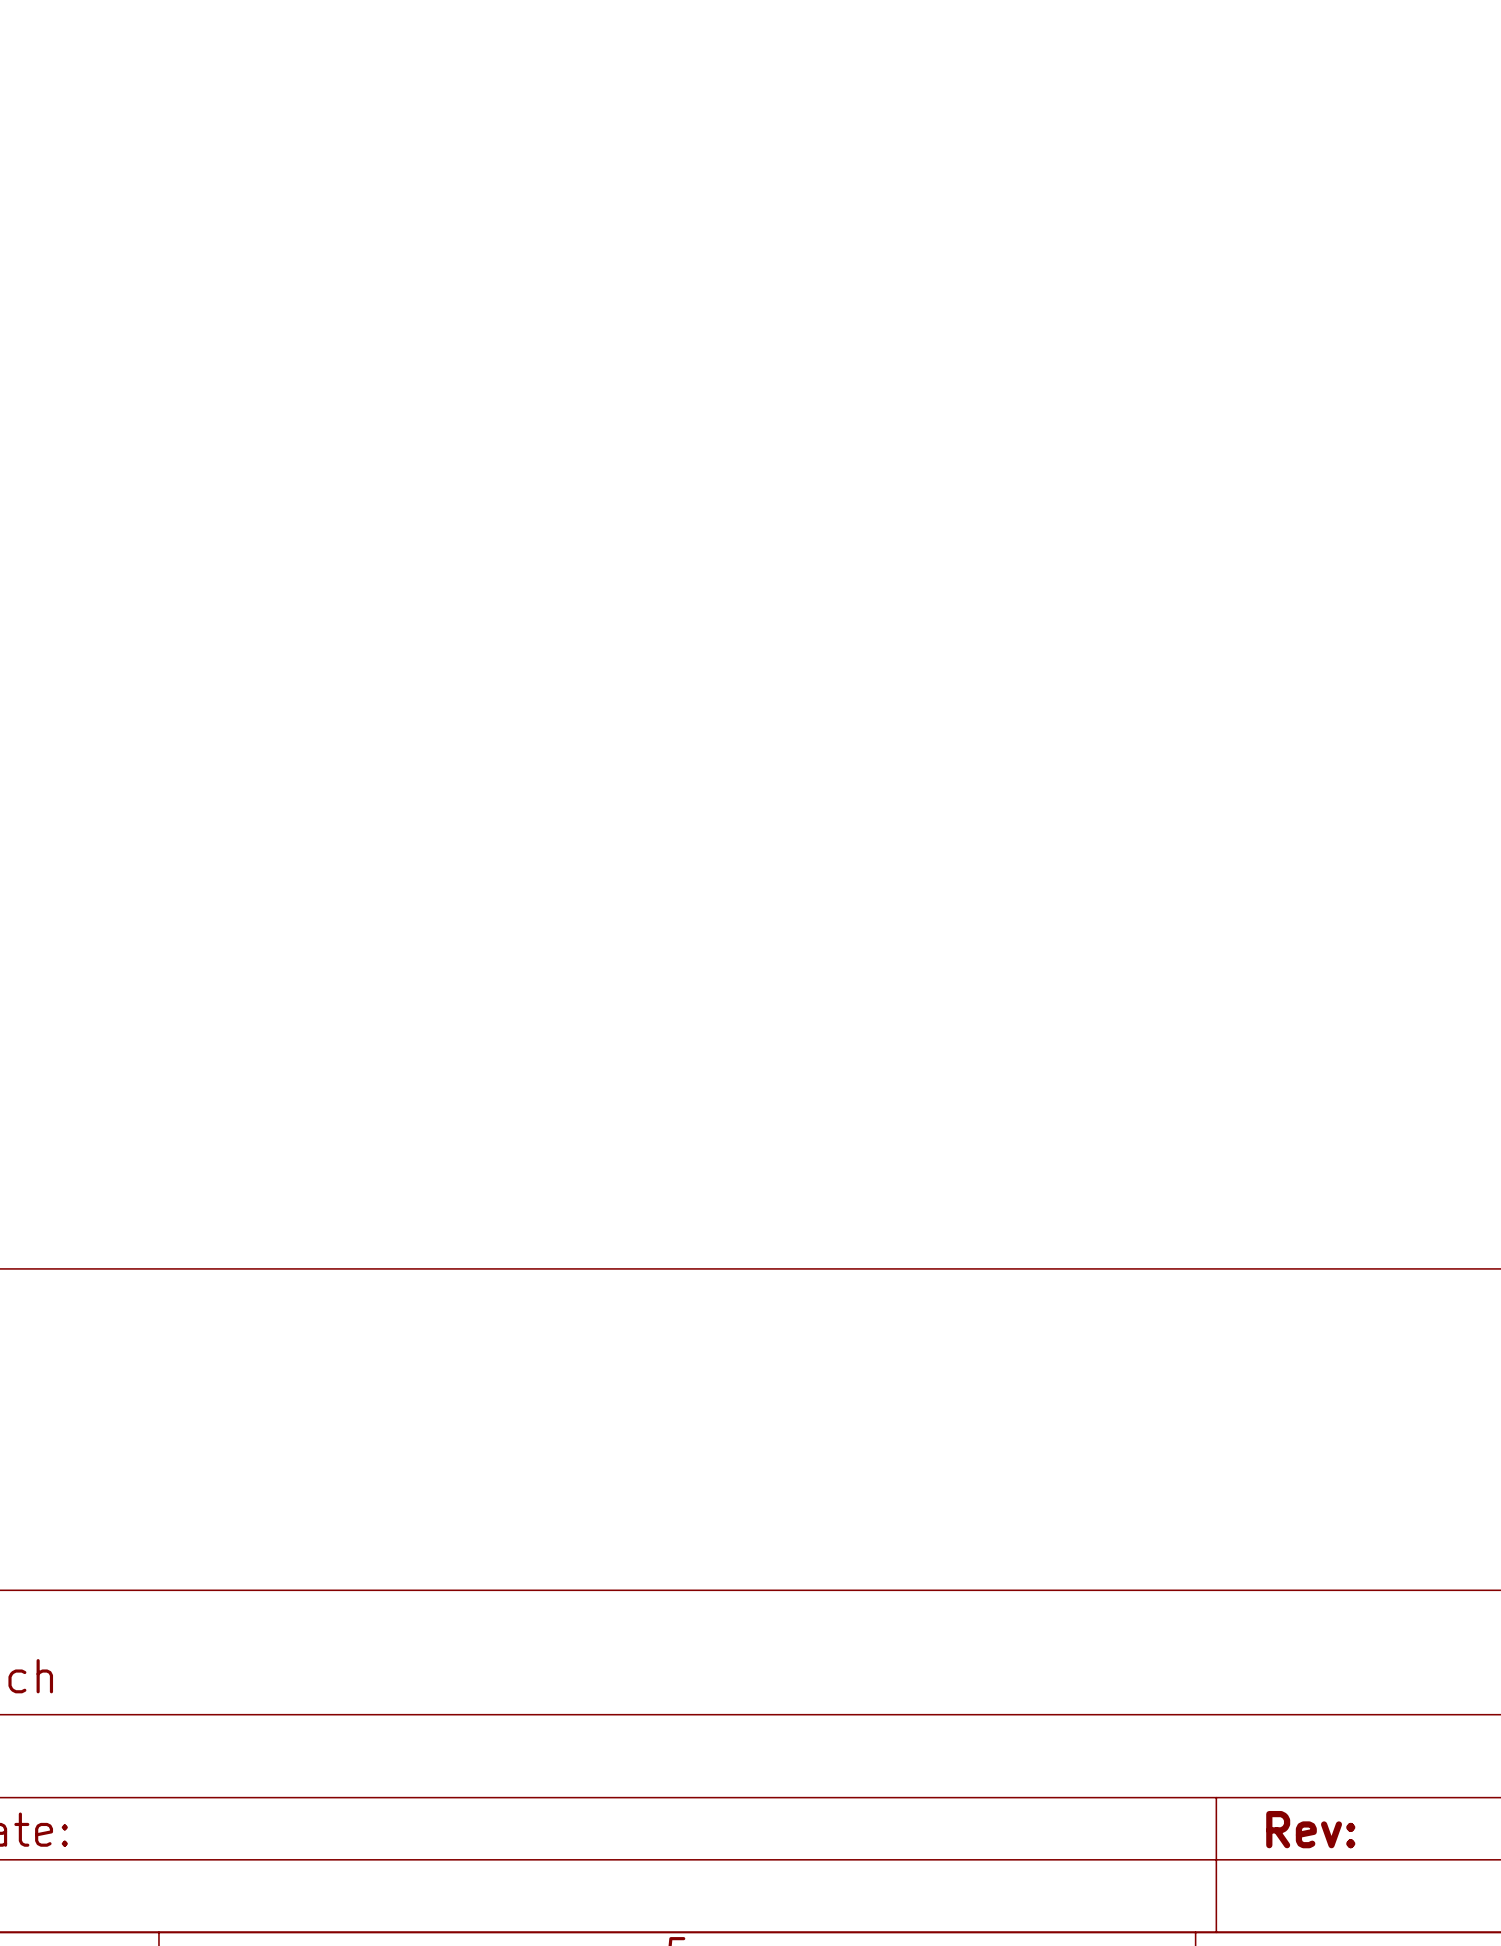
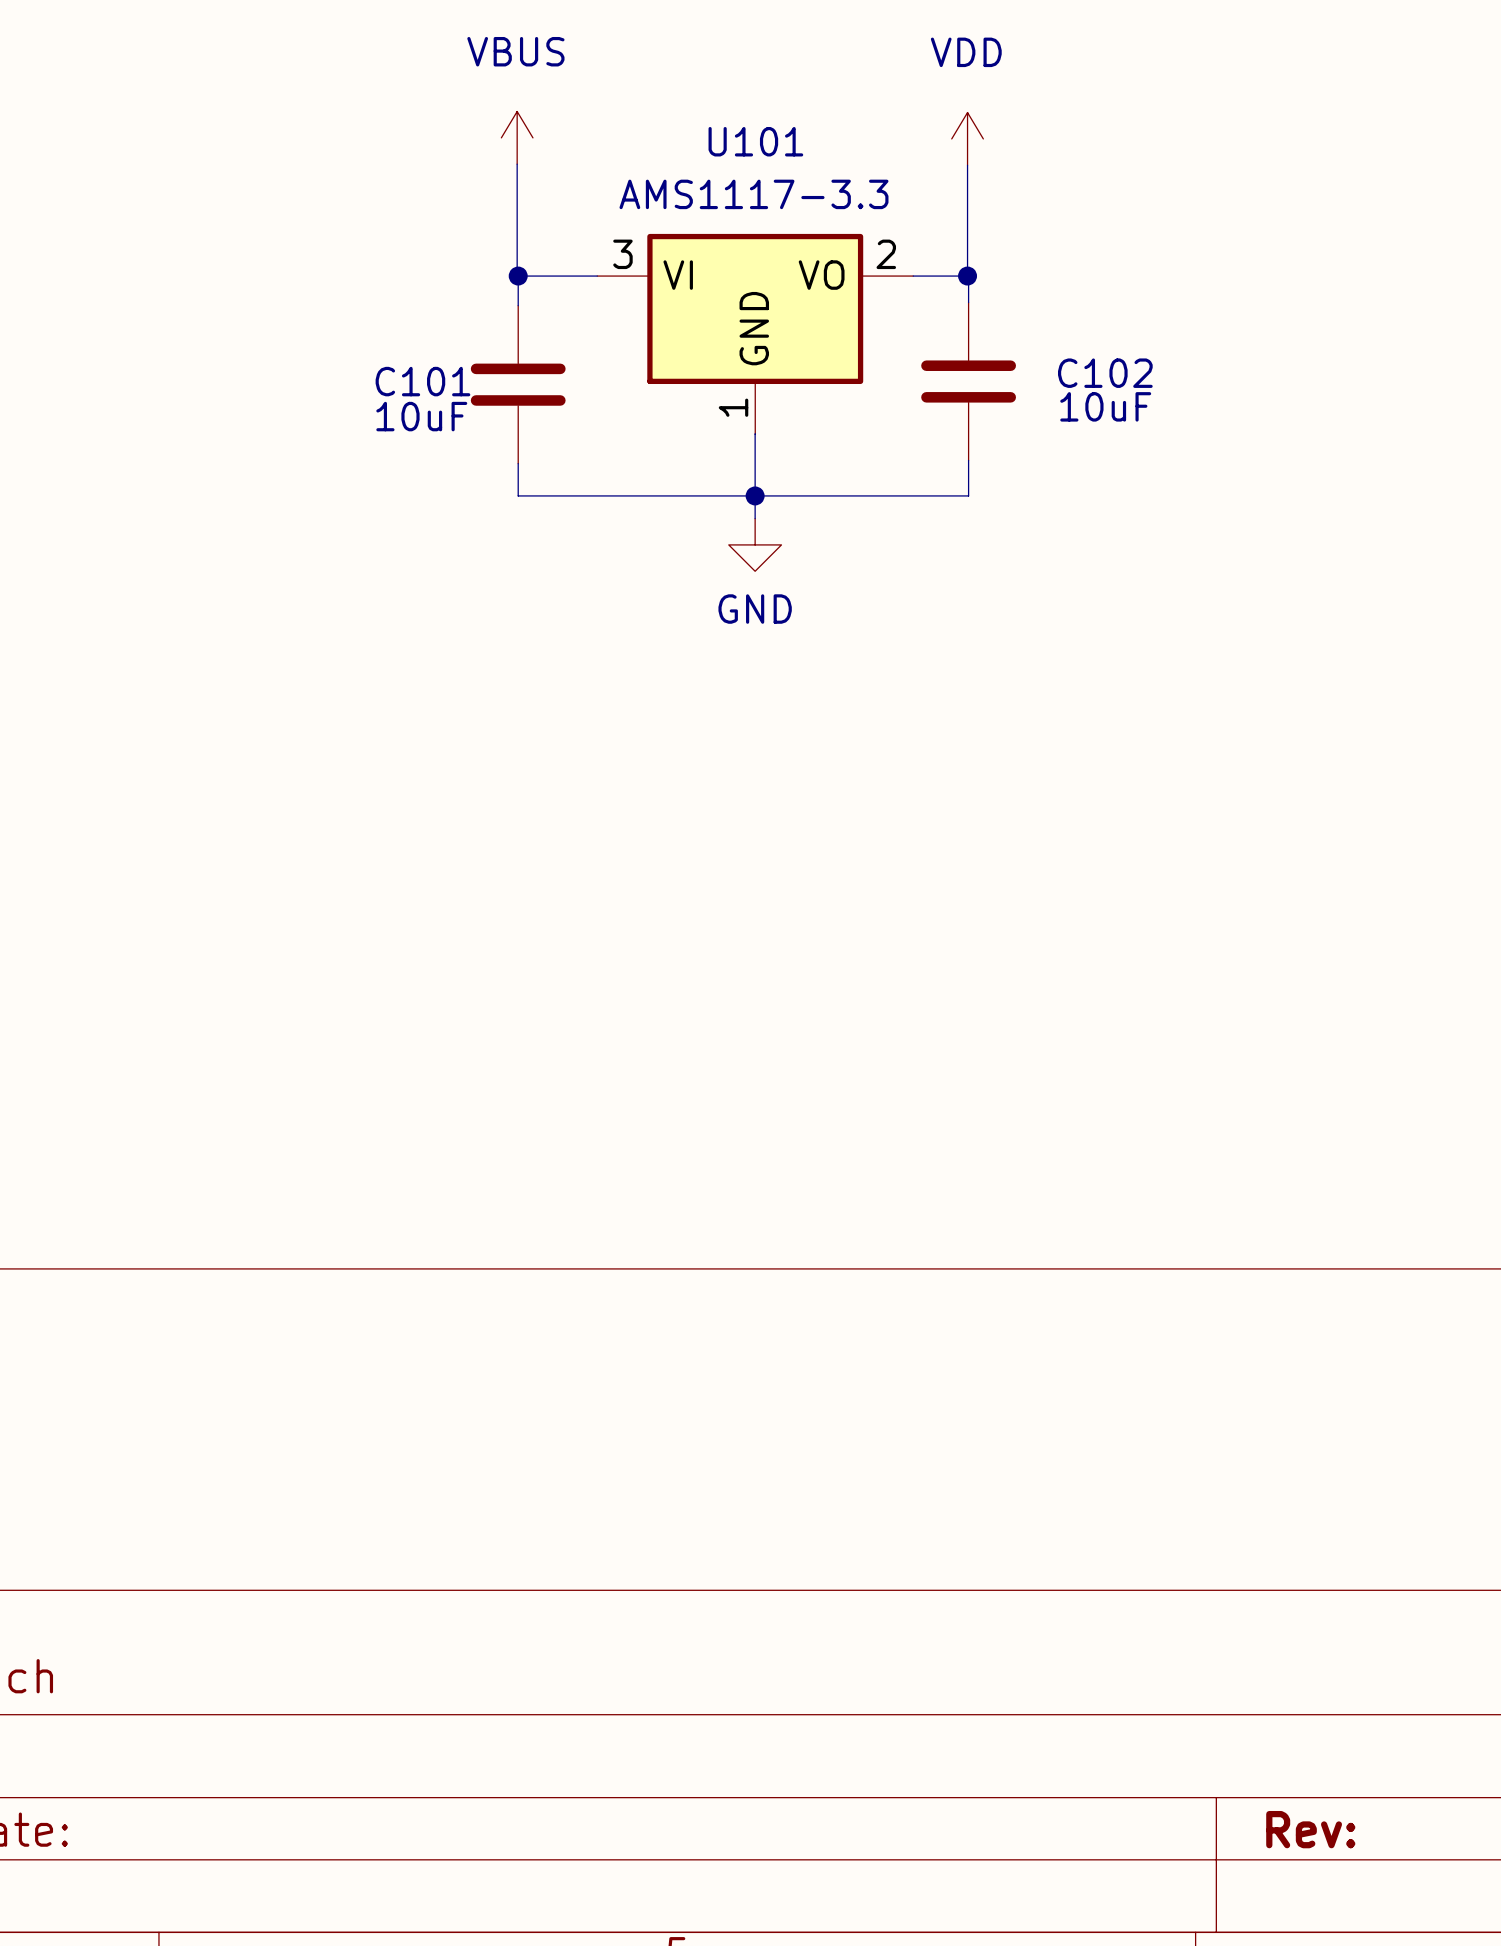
power symbol: none -> VBUS (517, 137)
power symbol: none -> VDD (967, 138)
wire: none -> (517, 164) (517, 276) (597, 276)
wire: none -> (967, 165) (967, 276)
wire: none -> (518, 276) (518, 305)
junction: none -> (518, 276)
wire: none -> (913, 276) (968, 276) (968, 302)
junction: none -> (967, 276)
U101: none -> AMS1117-3.3 (755, 333)
C102: none -> 10uF (968, 381)
C101: none -> 10uF (518, 384)
wire: none -> (755, 434) (755, 518)
wire: none -> (968, 460) (968, 495) (518, 495) (518, 463)
junction: none -> (755, 495)
power symbol: none -> GND (755, 544)

